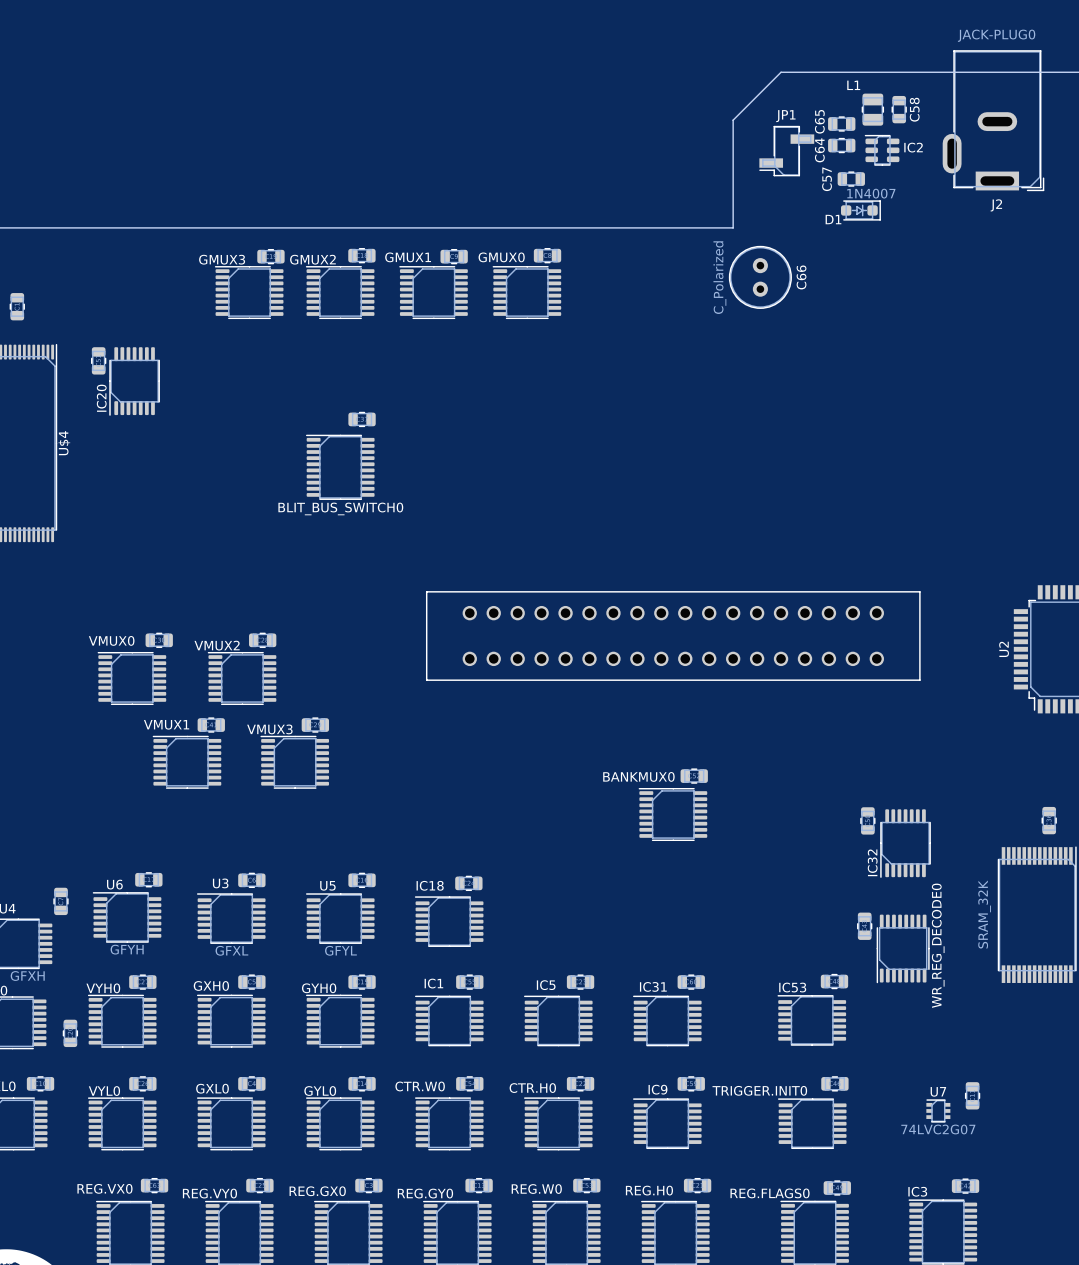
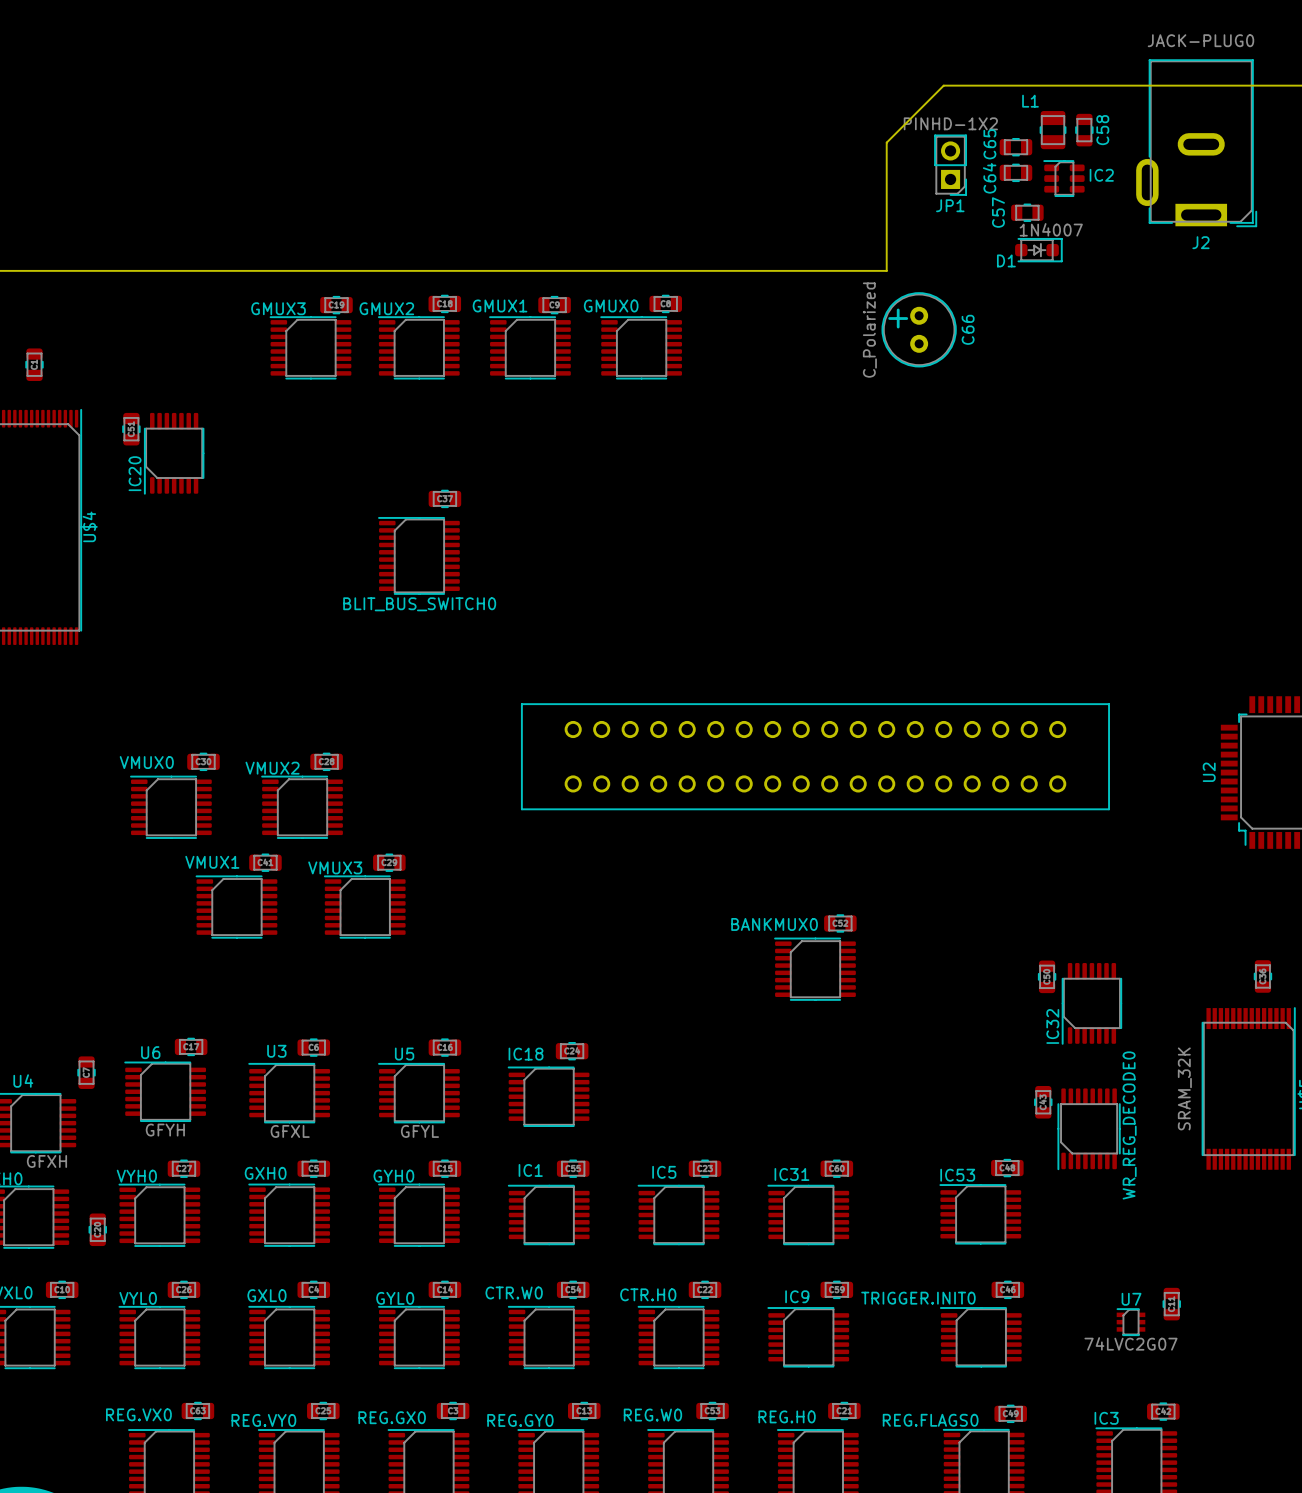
JP1 value: none -> PINHD-1X2 (950, 123)
JP1 name position: JP1 (785, 116) -> JP1 (950, 205)
JP1 footprint: [759, 126, 815, 177] -> [934, 134, 967, 196]
text: none -> + (898, 318)

